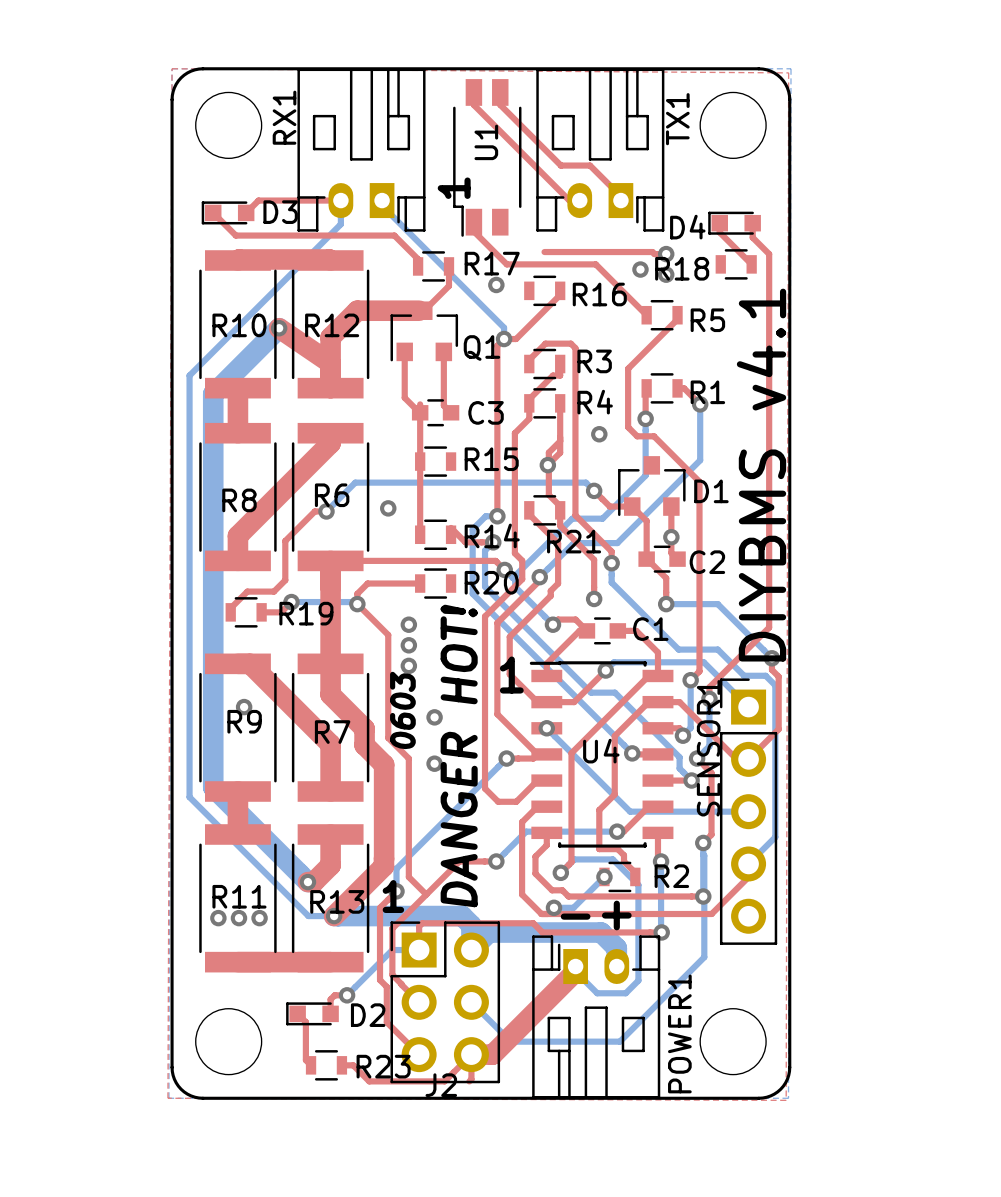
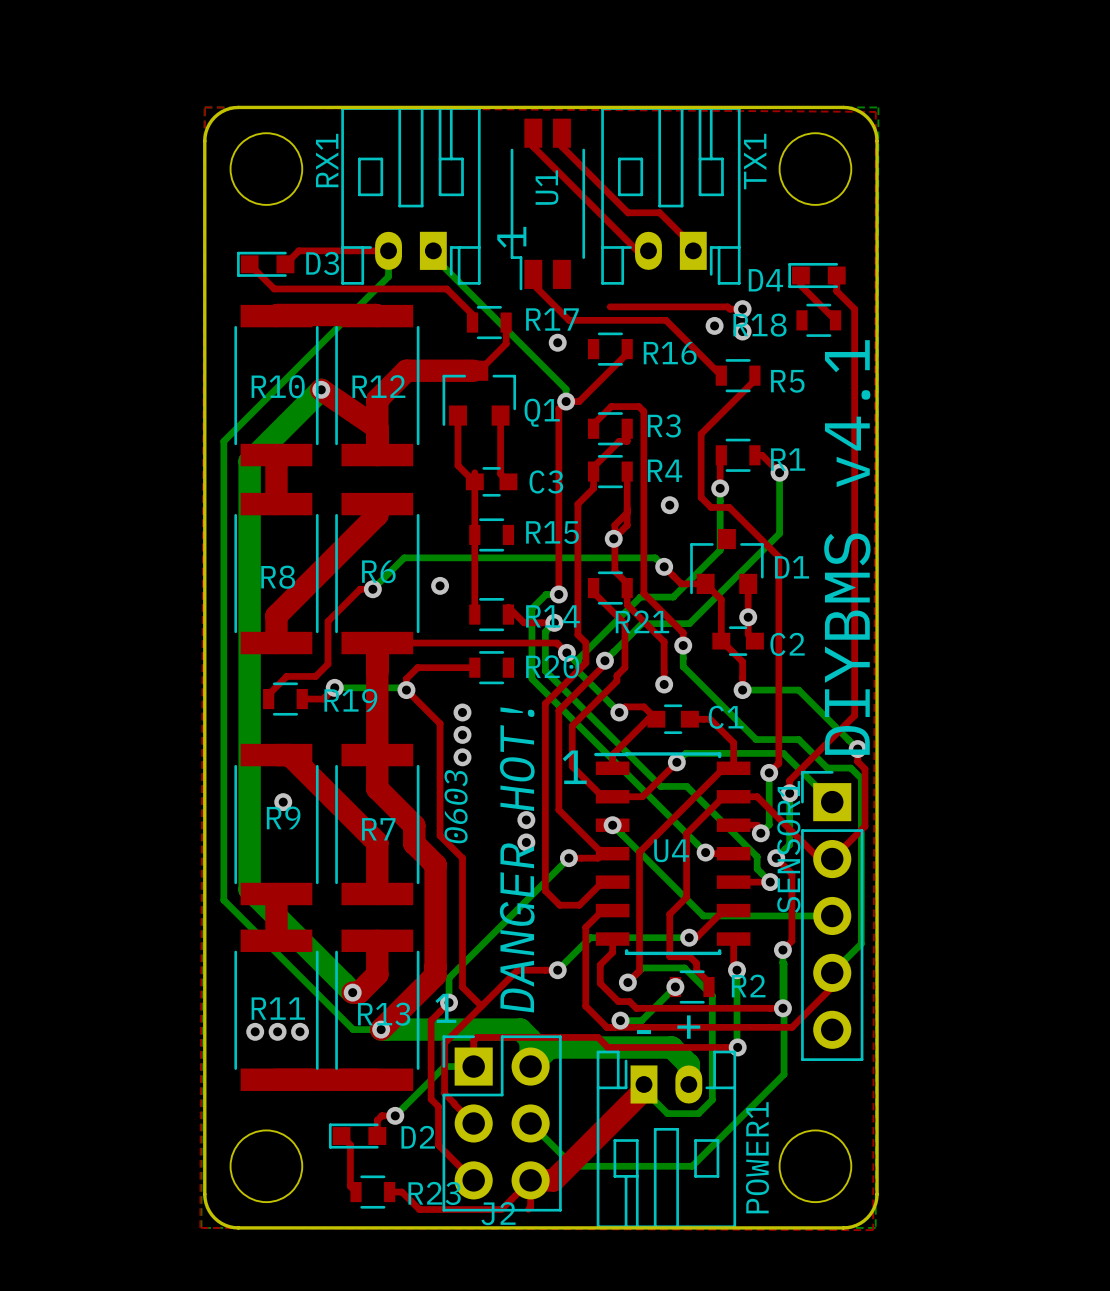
via: (434, 717) -> none
via: none -> (526, 820)
via: none -> (526, 842)
via: (434, 763) -> none

